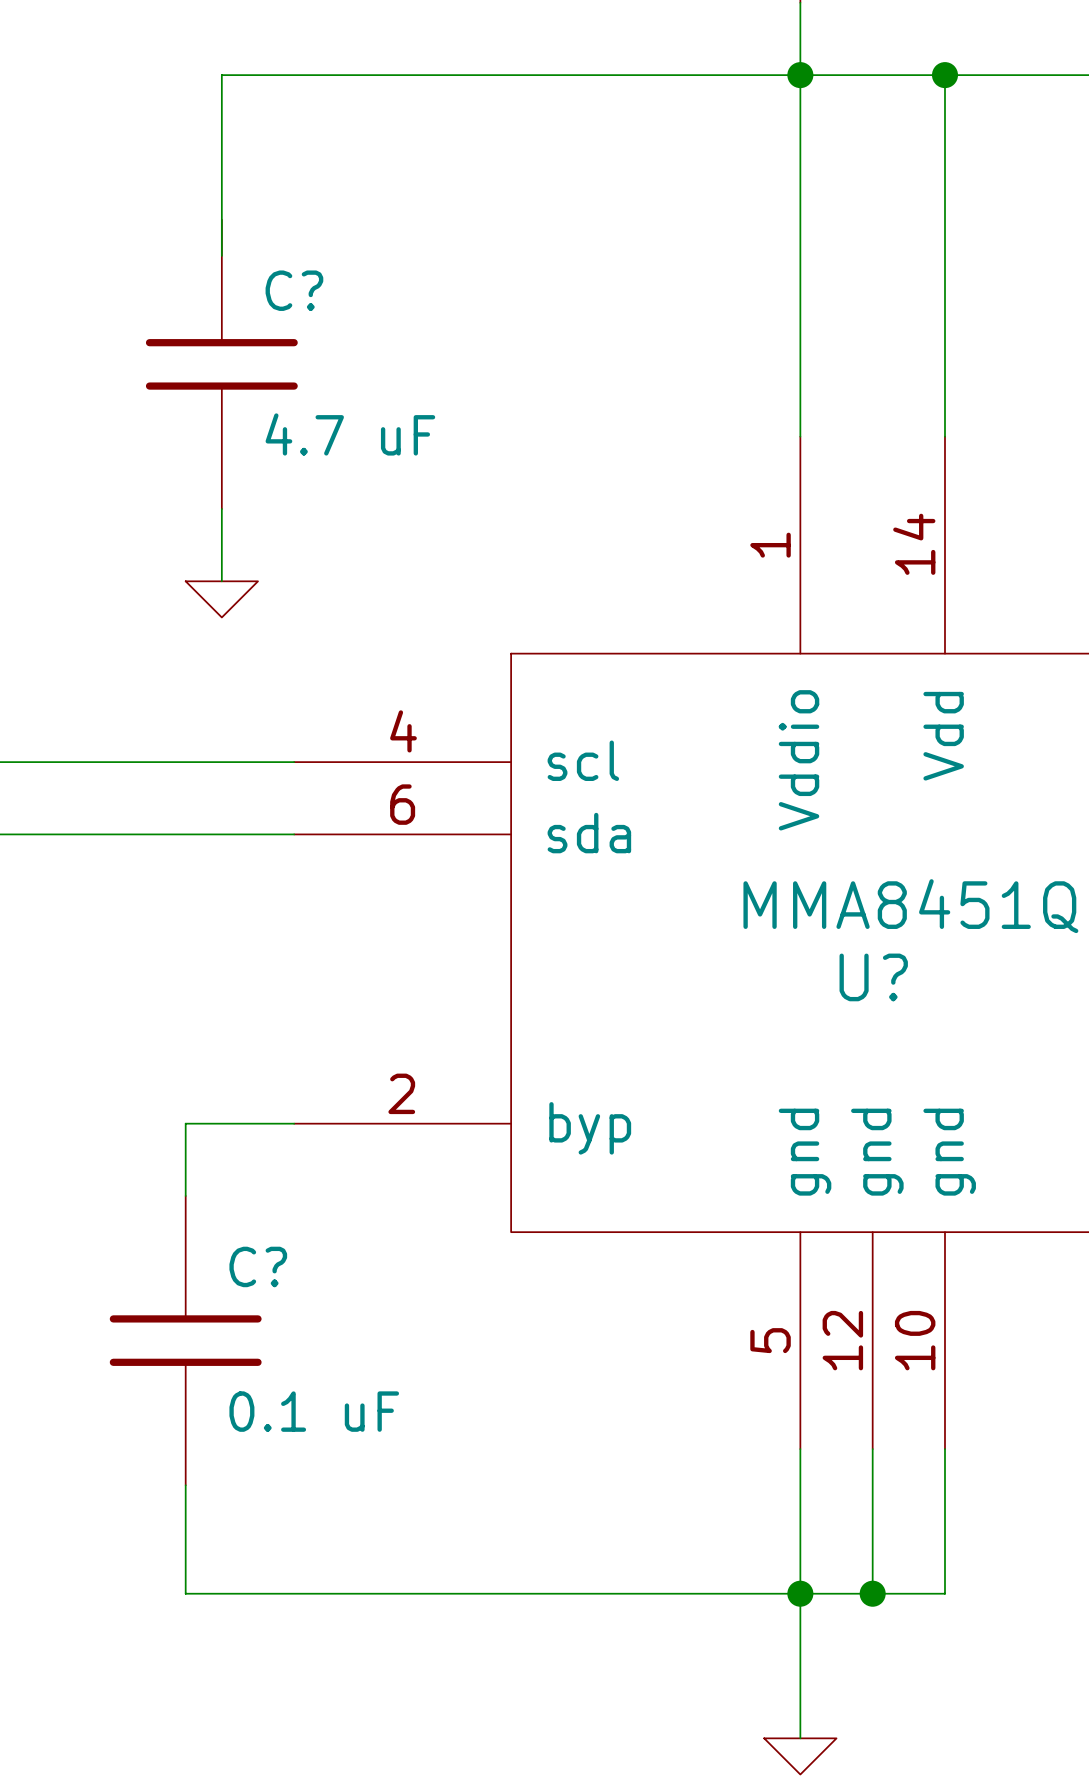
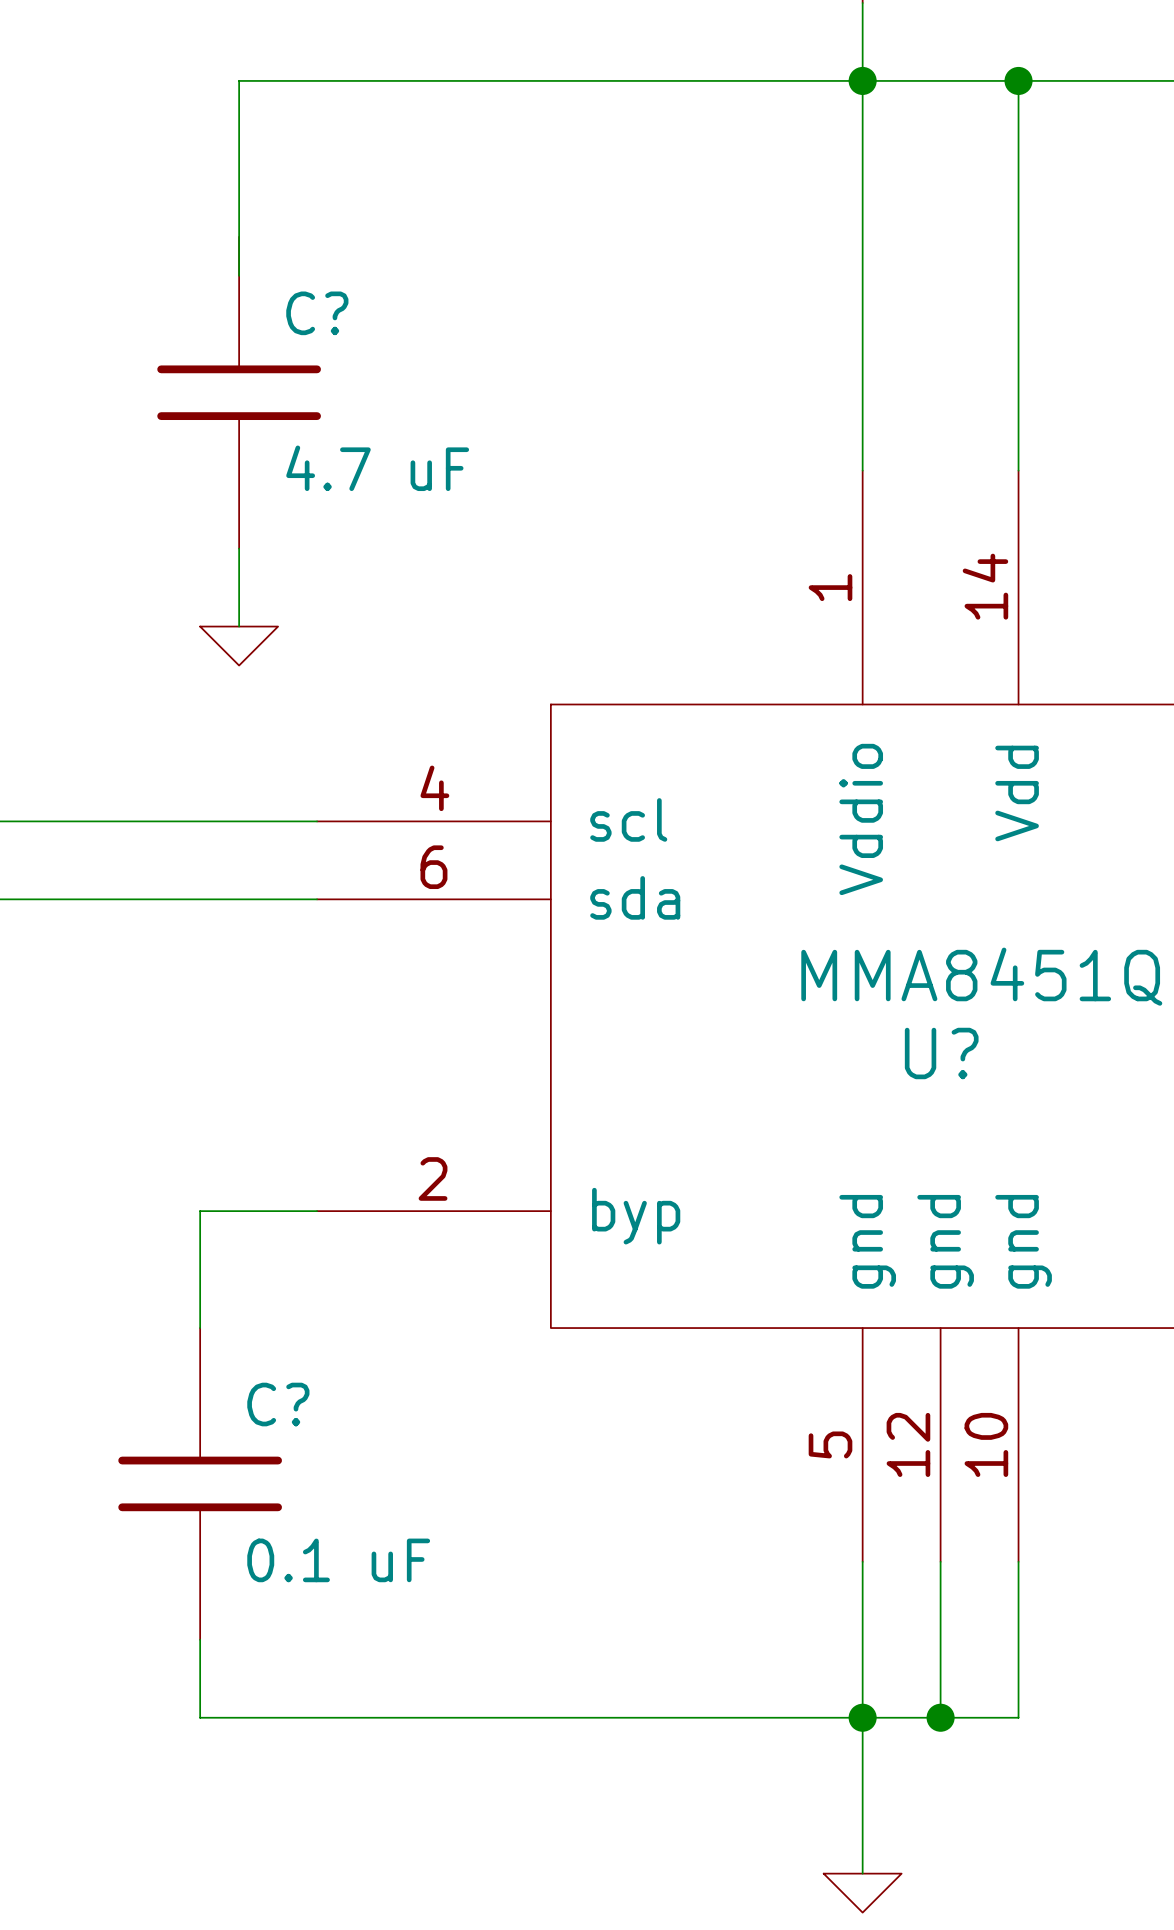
C? position: (185, 1340) -> (200, 1483)

